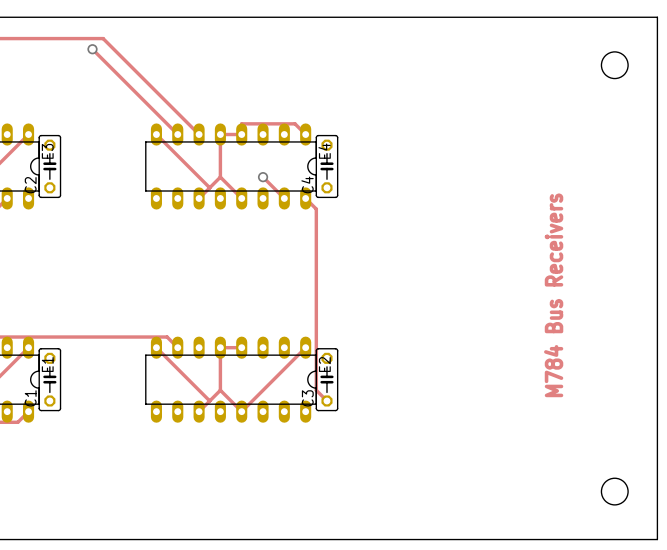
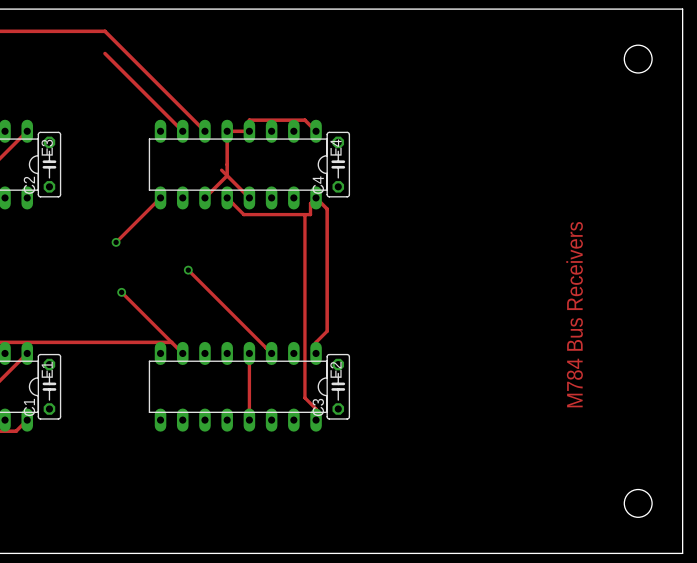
track: (92, 49) (103, 59) -> none
via: (92, 49) -> none
track: (156, 134) (209, 187) -> none
track: none -> (221, 170) (227, 175)
track: (263, 177) (284, 198) -> none
via: (263, 177) -> none
track: none -> (160, 197) (116, 242)
track: none -> (227, 197) (243, 214) (310, 214) (310, 203) (316, 197)
track: none -> (304, 214) (304, 397) (316, 408) (316, 420)
via: none -> (116, 242)
track: none -> (188, 270) (271, 353)
via: none -> (188, 270)
track: none -> (121, 292) (171, 342)
via: none -> (121, 292)
track: (316, 326) (316, 390) (326, 400) -> (327, 331) (316, 342) (316, 353)
track: (156, 347) (209, 400) -> none
track: (241, 347) (220, 347) (220, 390) -> (249, 353) (249, 420)
track: (305, 347) (241, 411) (220, 390) -> none
track: (220, 390) (199, 411) -> none

